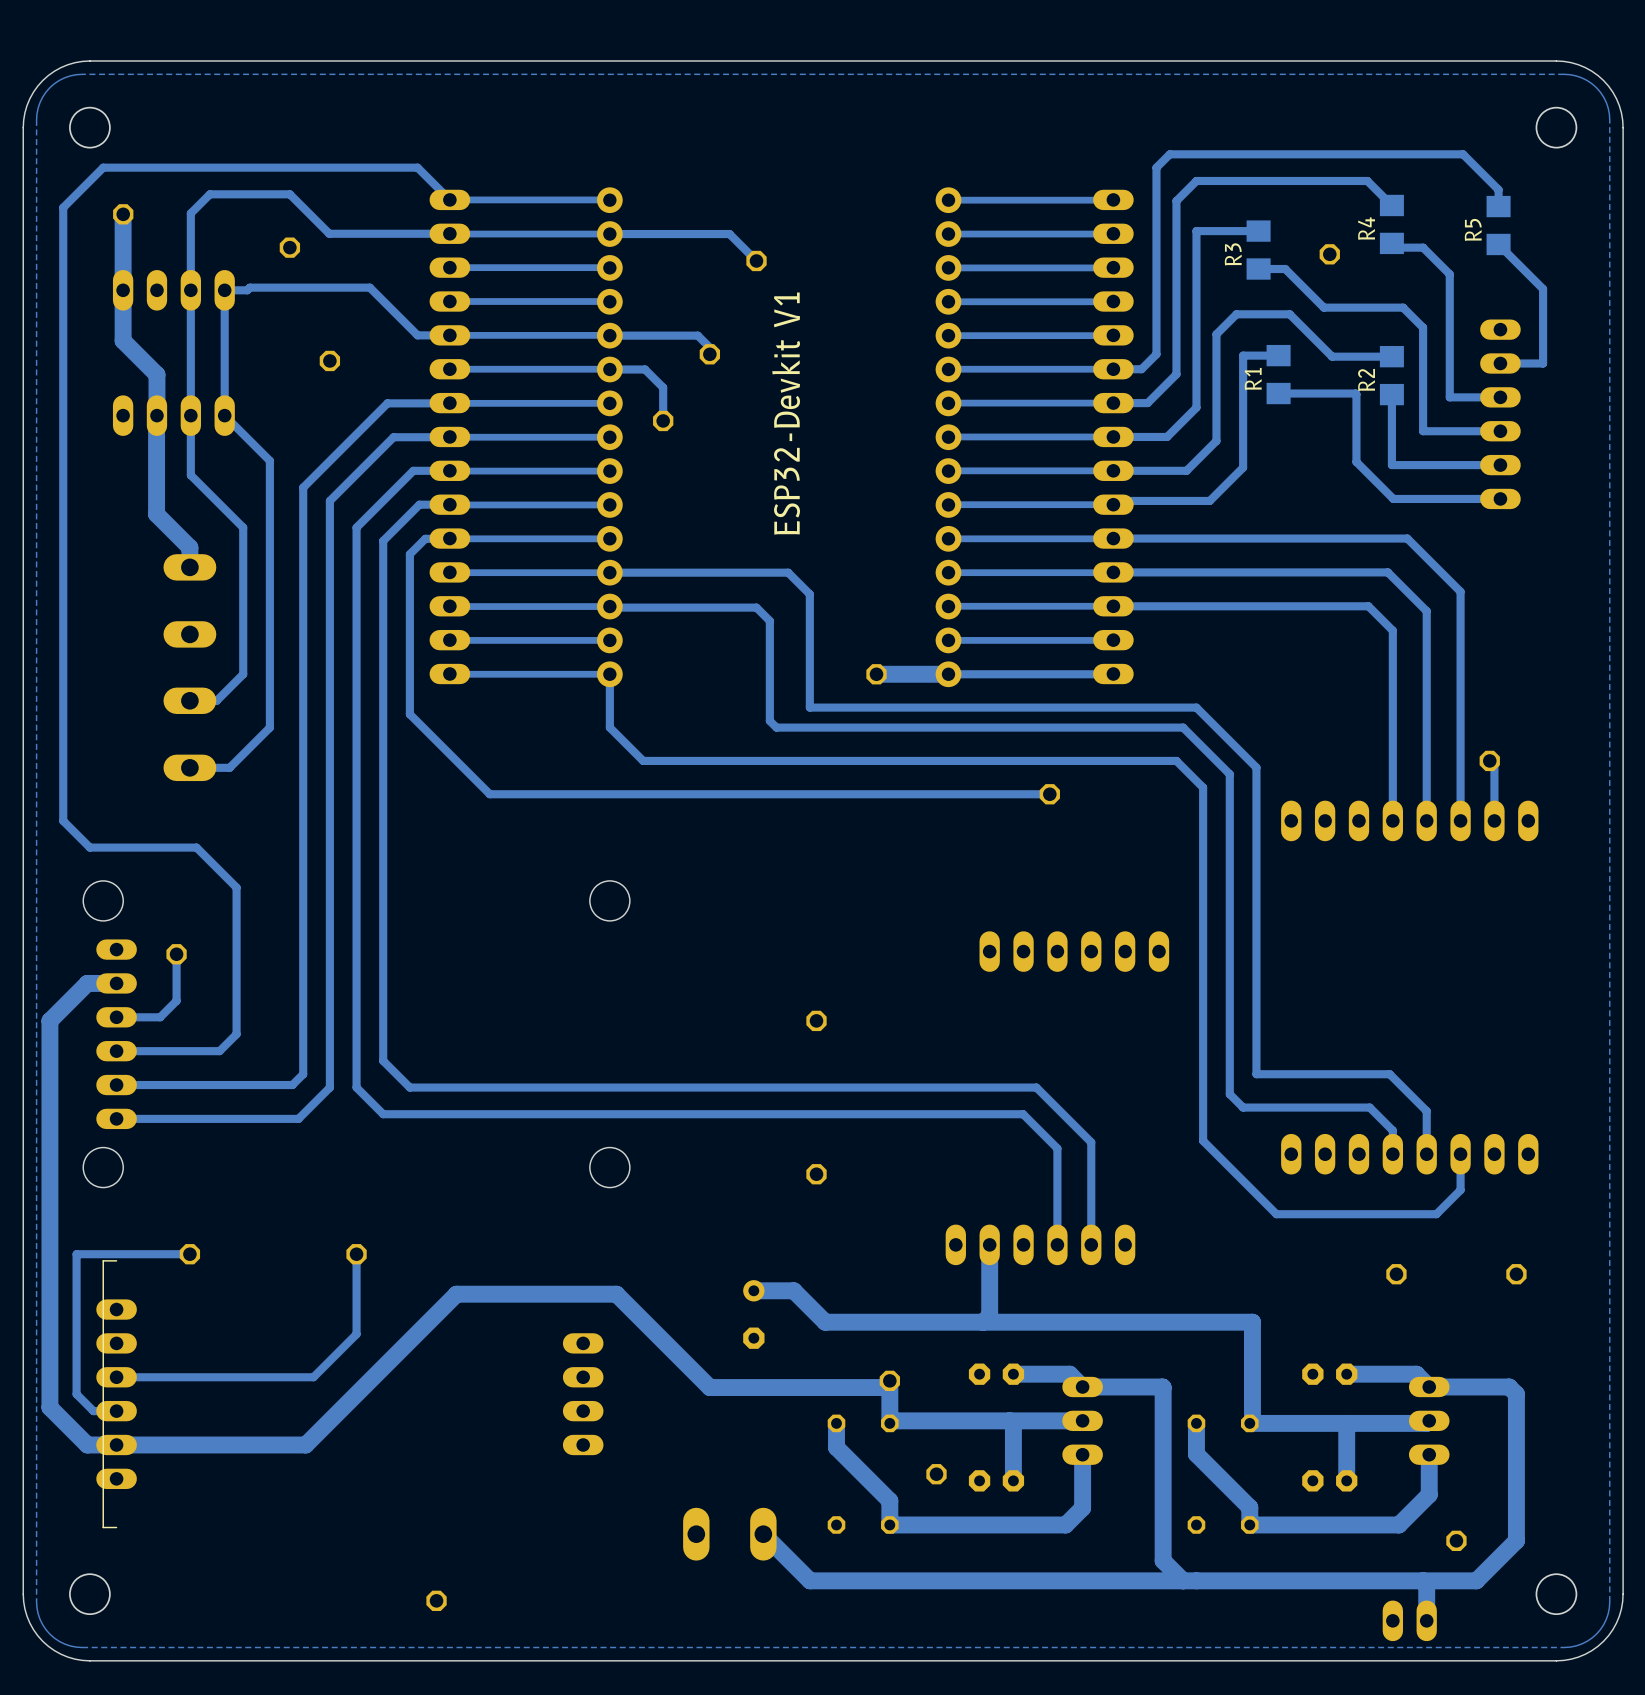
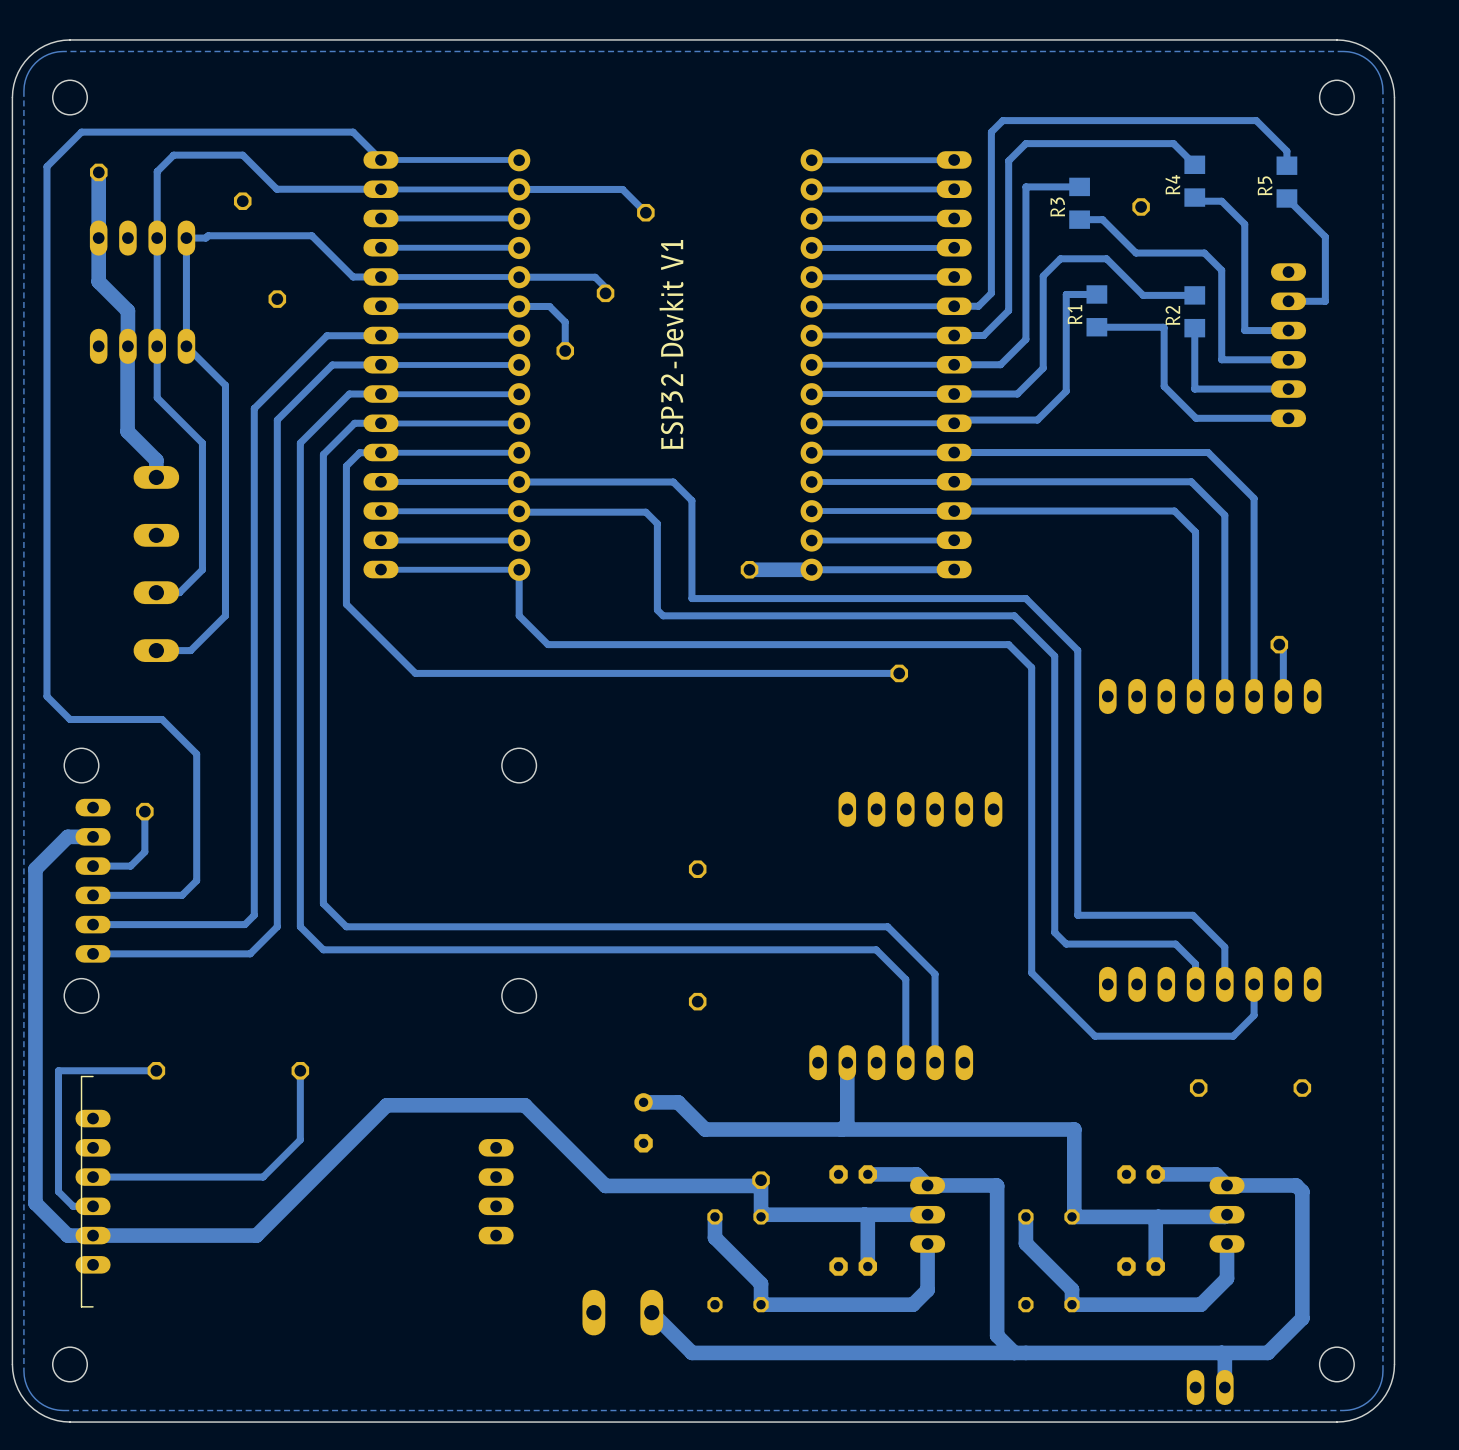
part: (936, 1474) -> none
part: (1456, 1540) -> none
part: (436, 1600) -> none

